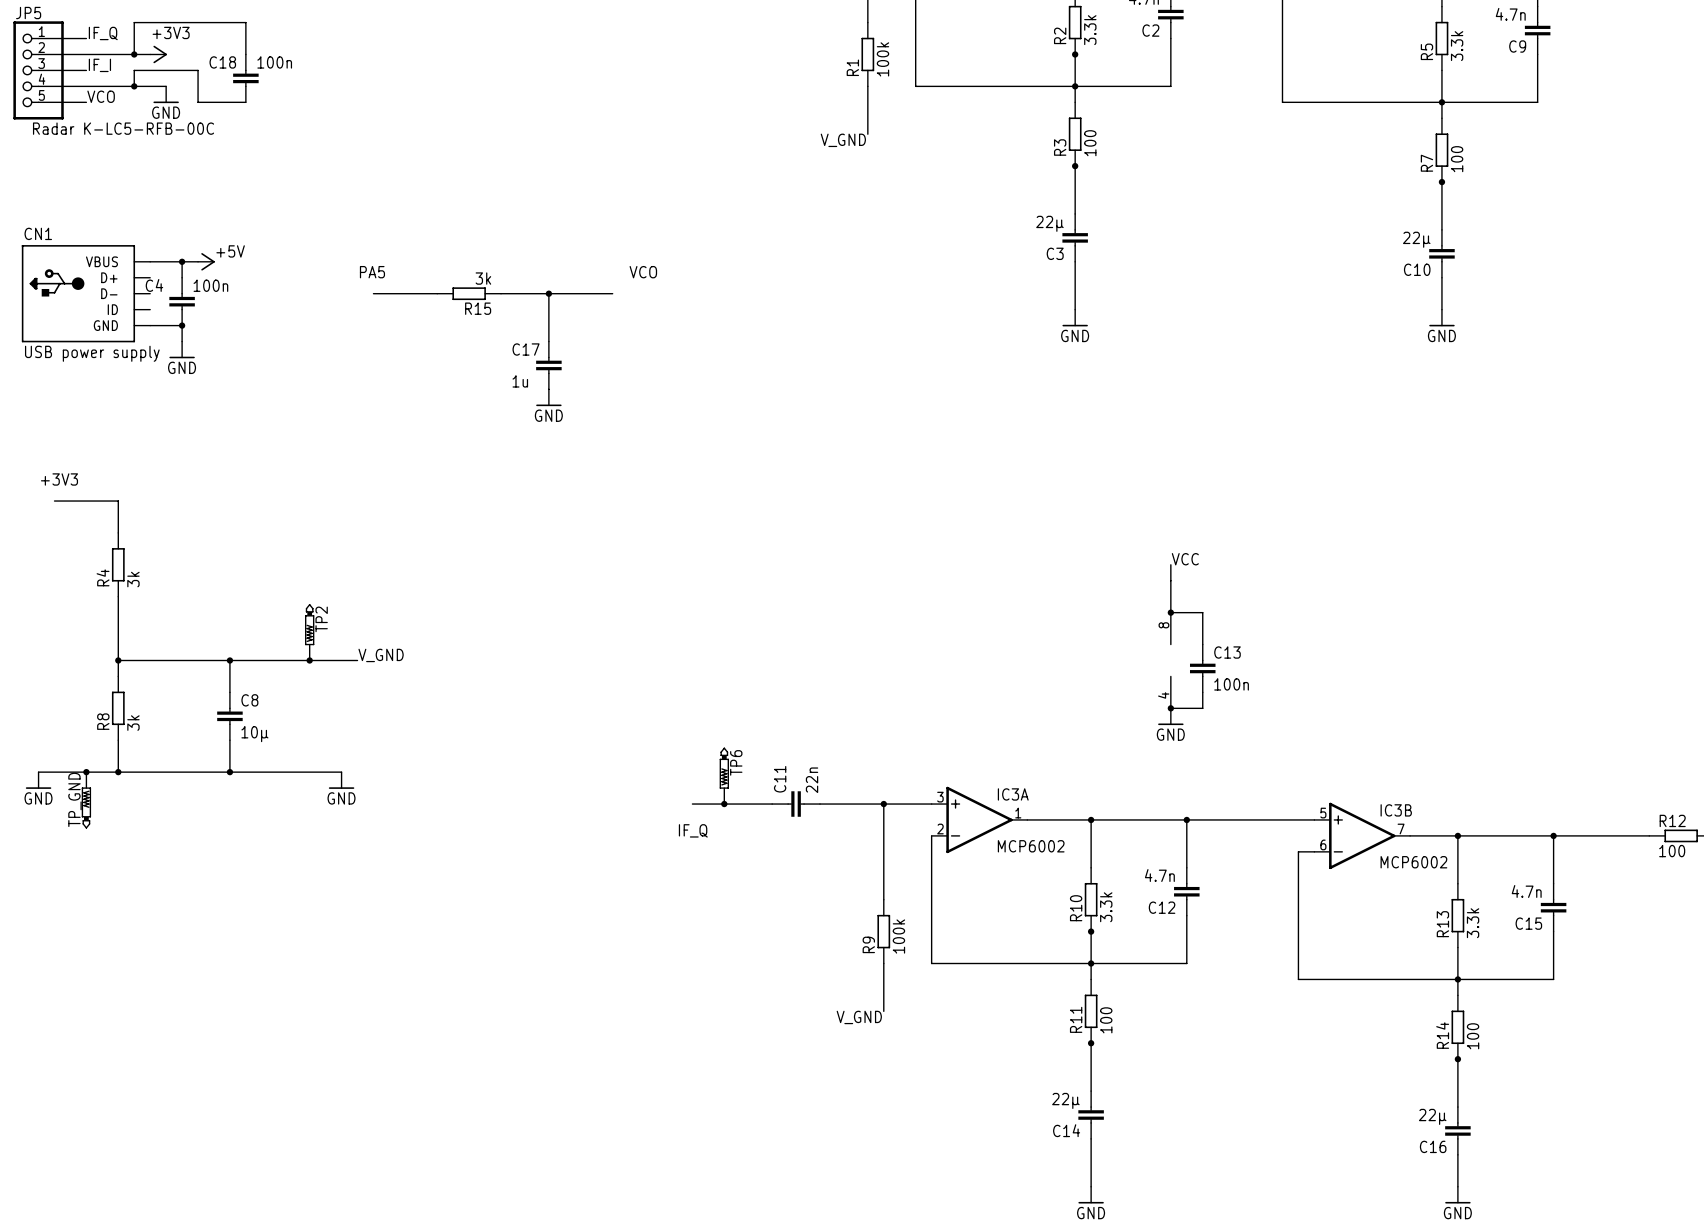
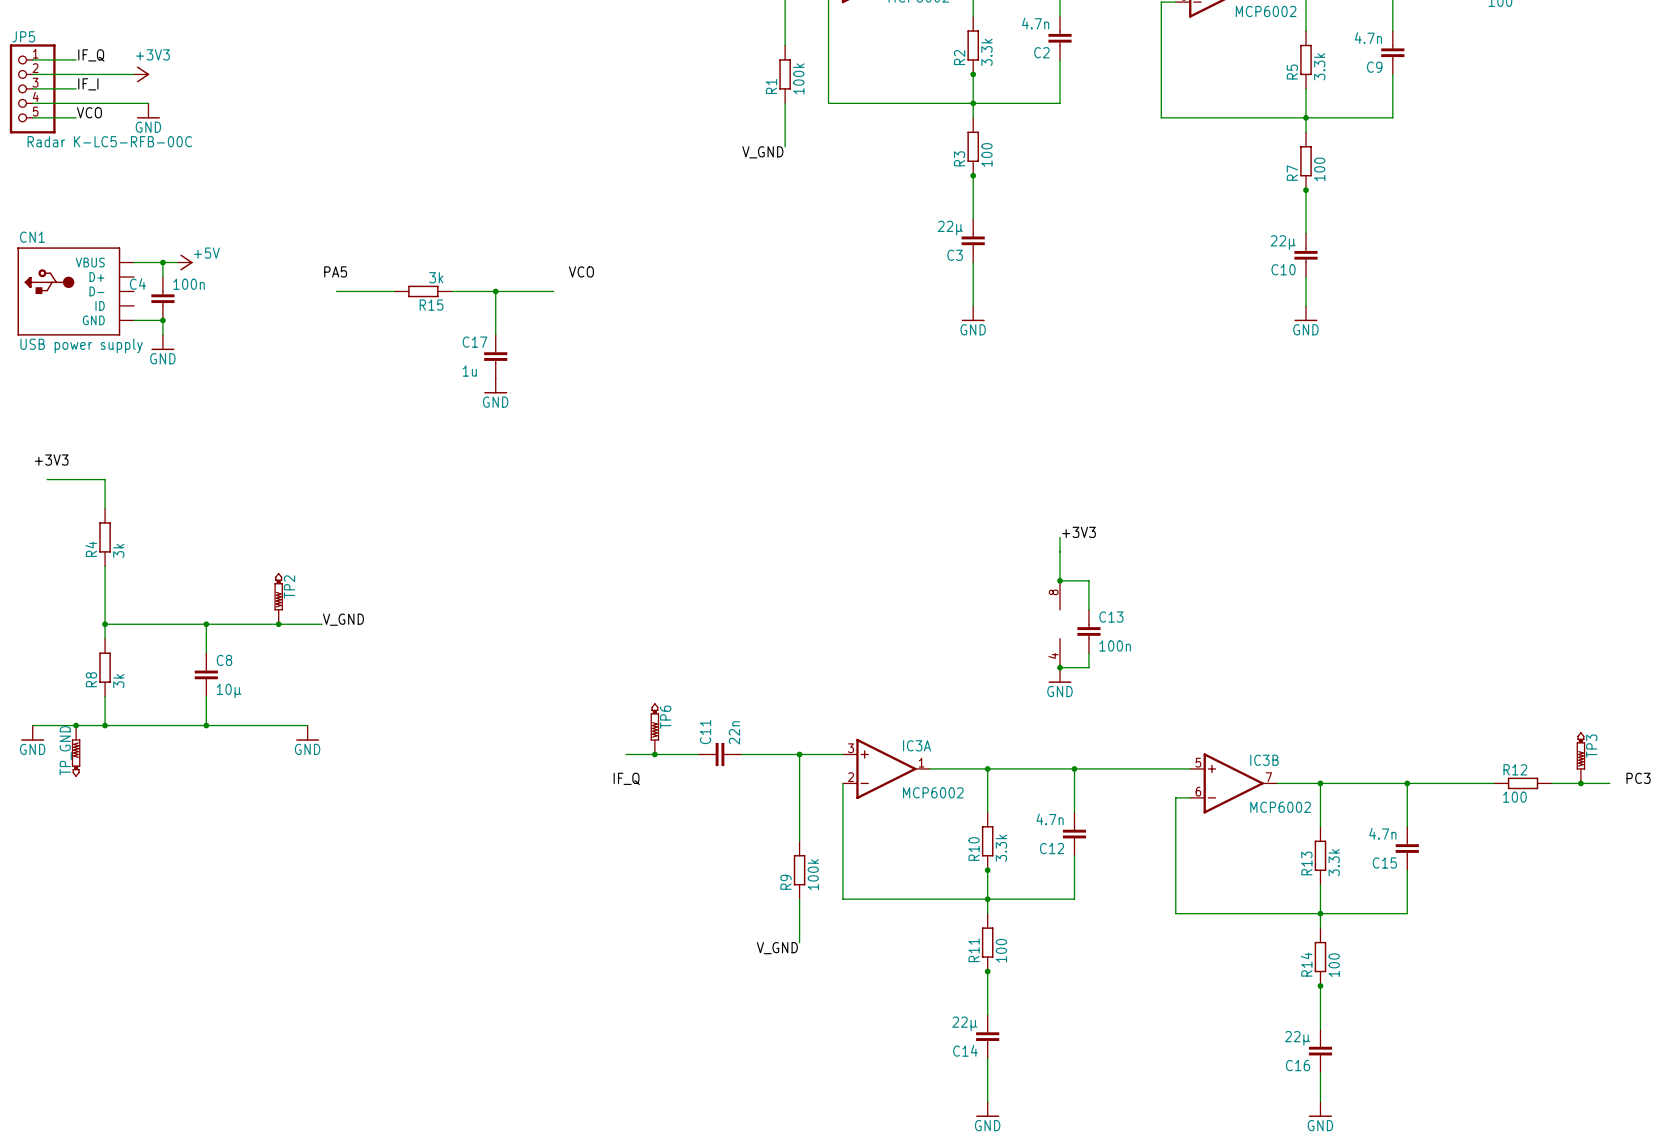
wire: (134, 54) (134, 22) (245, 22) (245, 54) -> none
junction: (134, 54) -> none
C18: 100n (245, 78) -> none
wire: (134, 86) (134, 70) (198, 70) (198, 102) (245, 102) -> none
junction: (134, 86) -> none
label: VCC (1185, 559) -> +3V3 (1079, 532)

